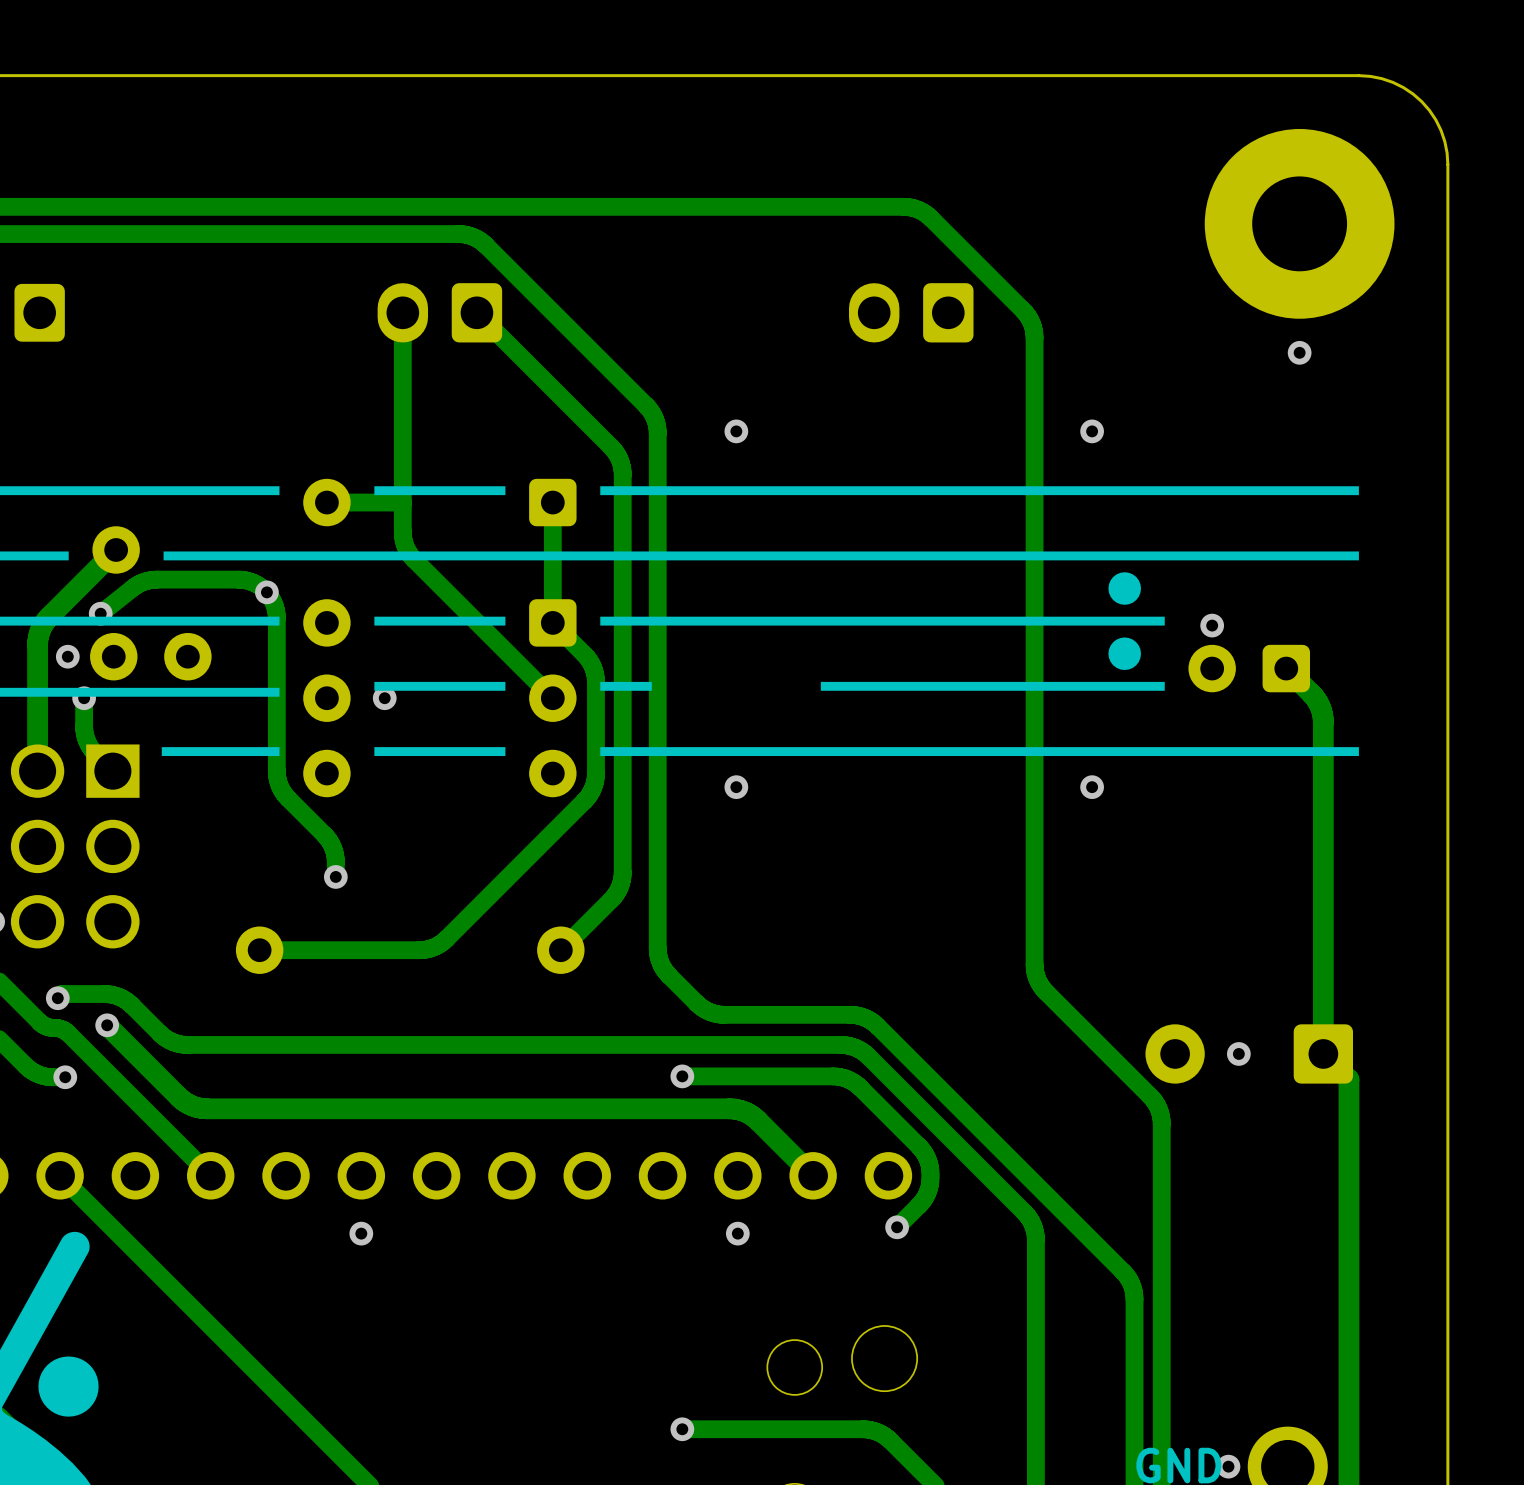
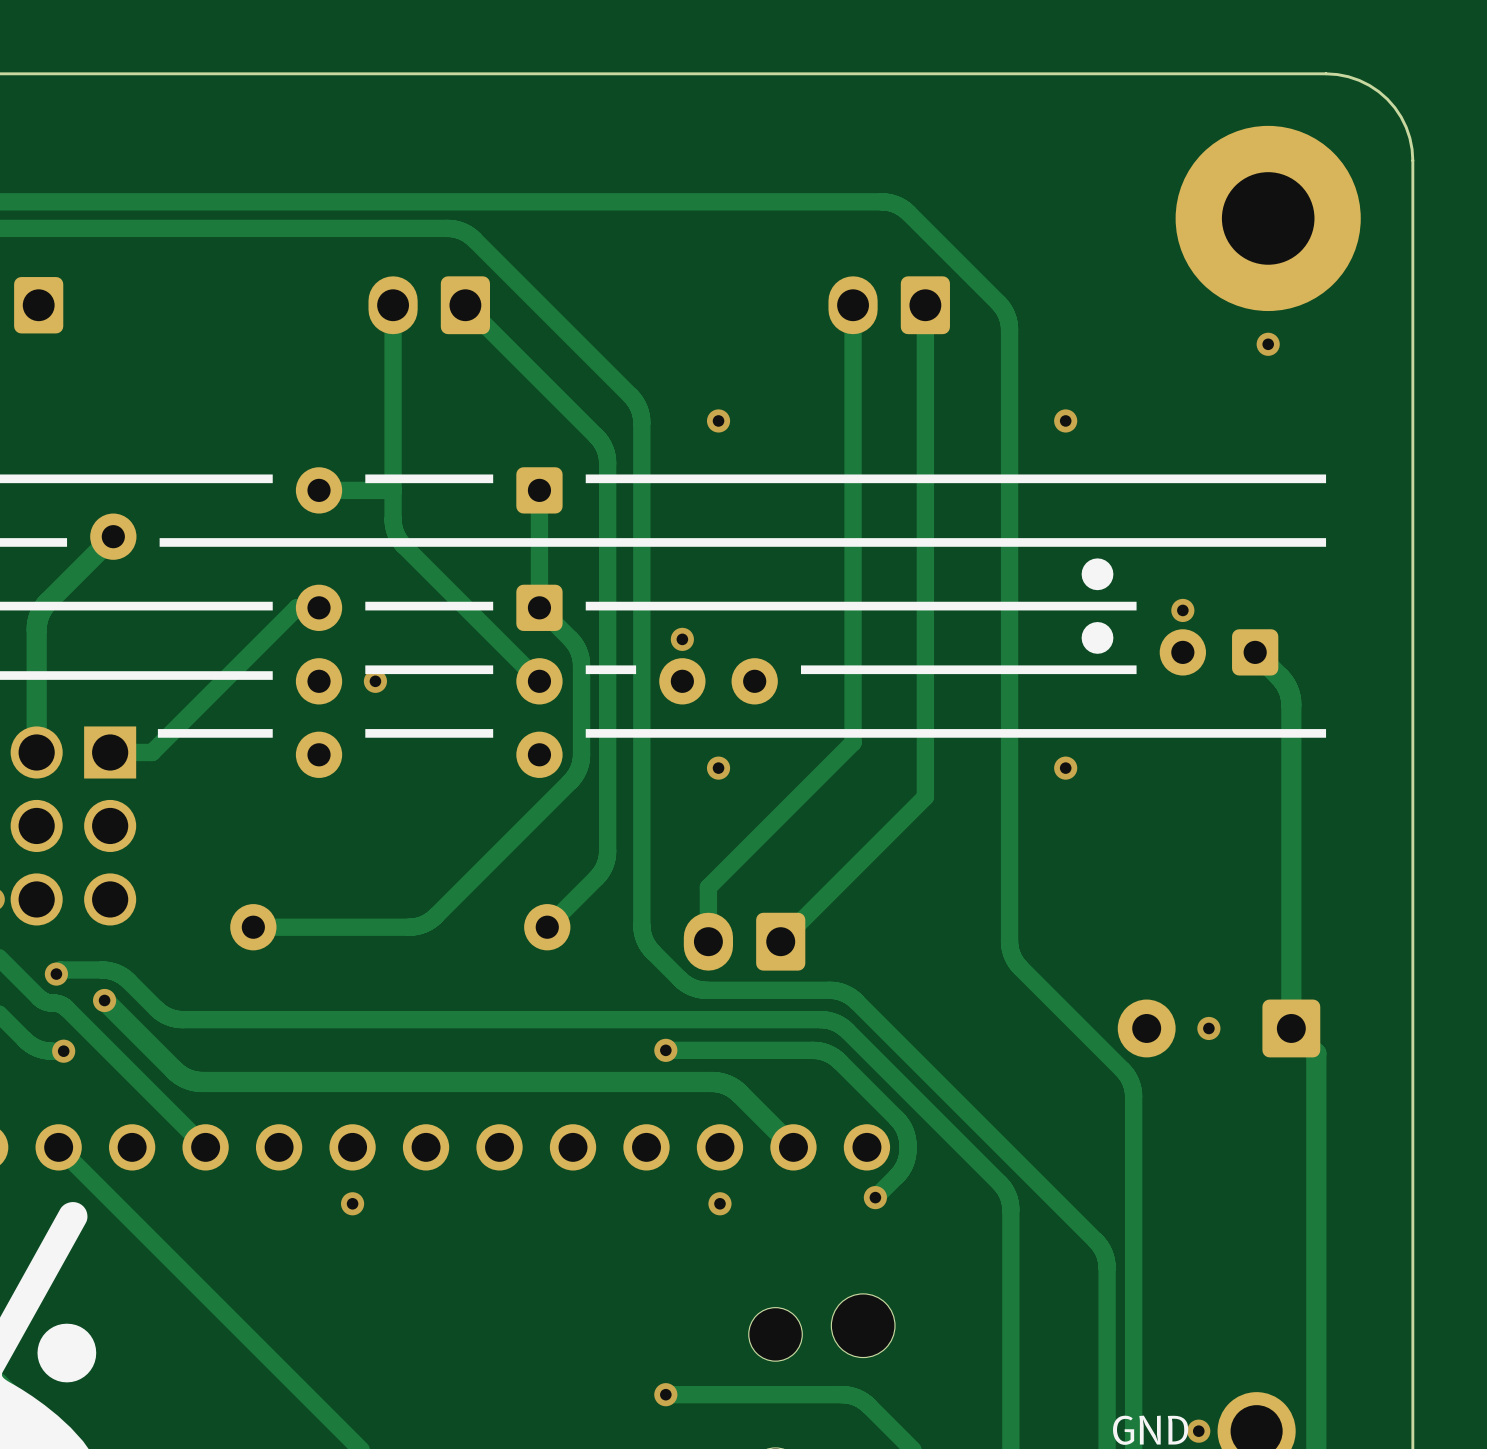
track: none -> (853, 305) (853, 742) (708, 887) (708, 941)
track: none -> (925, 305) (925, 797) (780, 941)
via: (266, 592) -> none
track: (100, 613) (135, 585) (153, 579) (242, 579) (253, 582) (266, 592) (273, 602) (276, 614) (277, 778) (285, 795) (331, 843) (335, 858) (335, 876) -> none
via: (100, 613) -> none
via: none -> (682, 639)
via: (67, 656) -> none
part position: (150, 656) -> (718, 681)
track: (84, 698) (84, 730) (87, 741) (92, 750) (112, 771) -> (319, 607) (296, 607) (152, 752) (110, 752)
via: (84, 698) -> none
via: (335, 876) -> none
part: none -> (744, 941)

